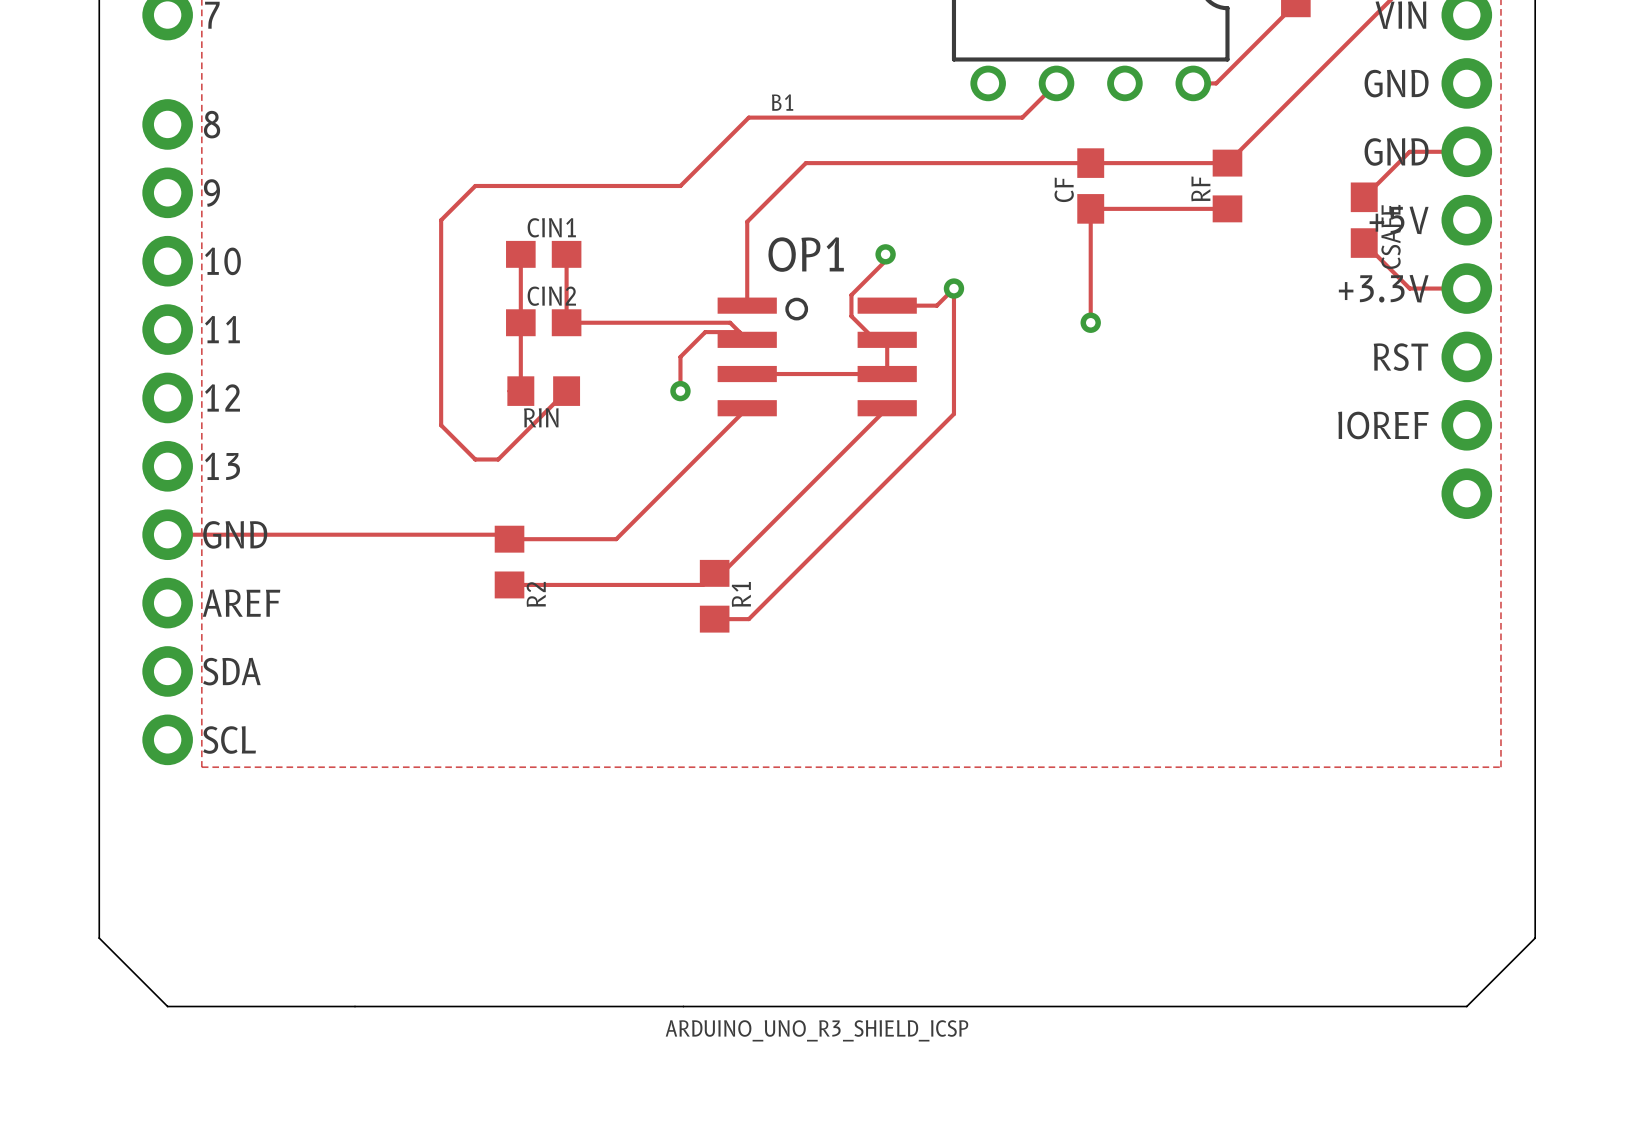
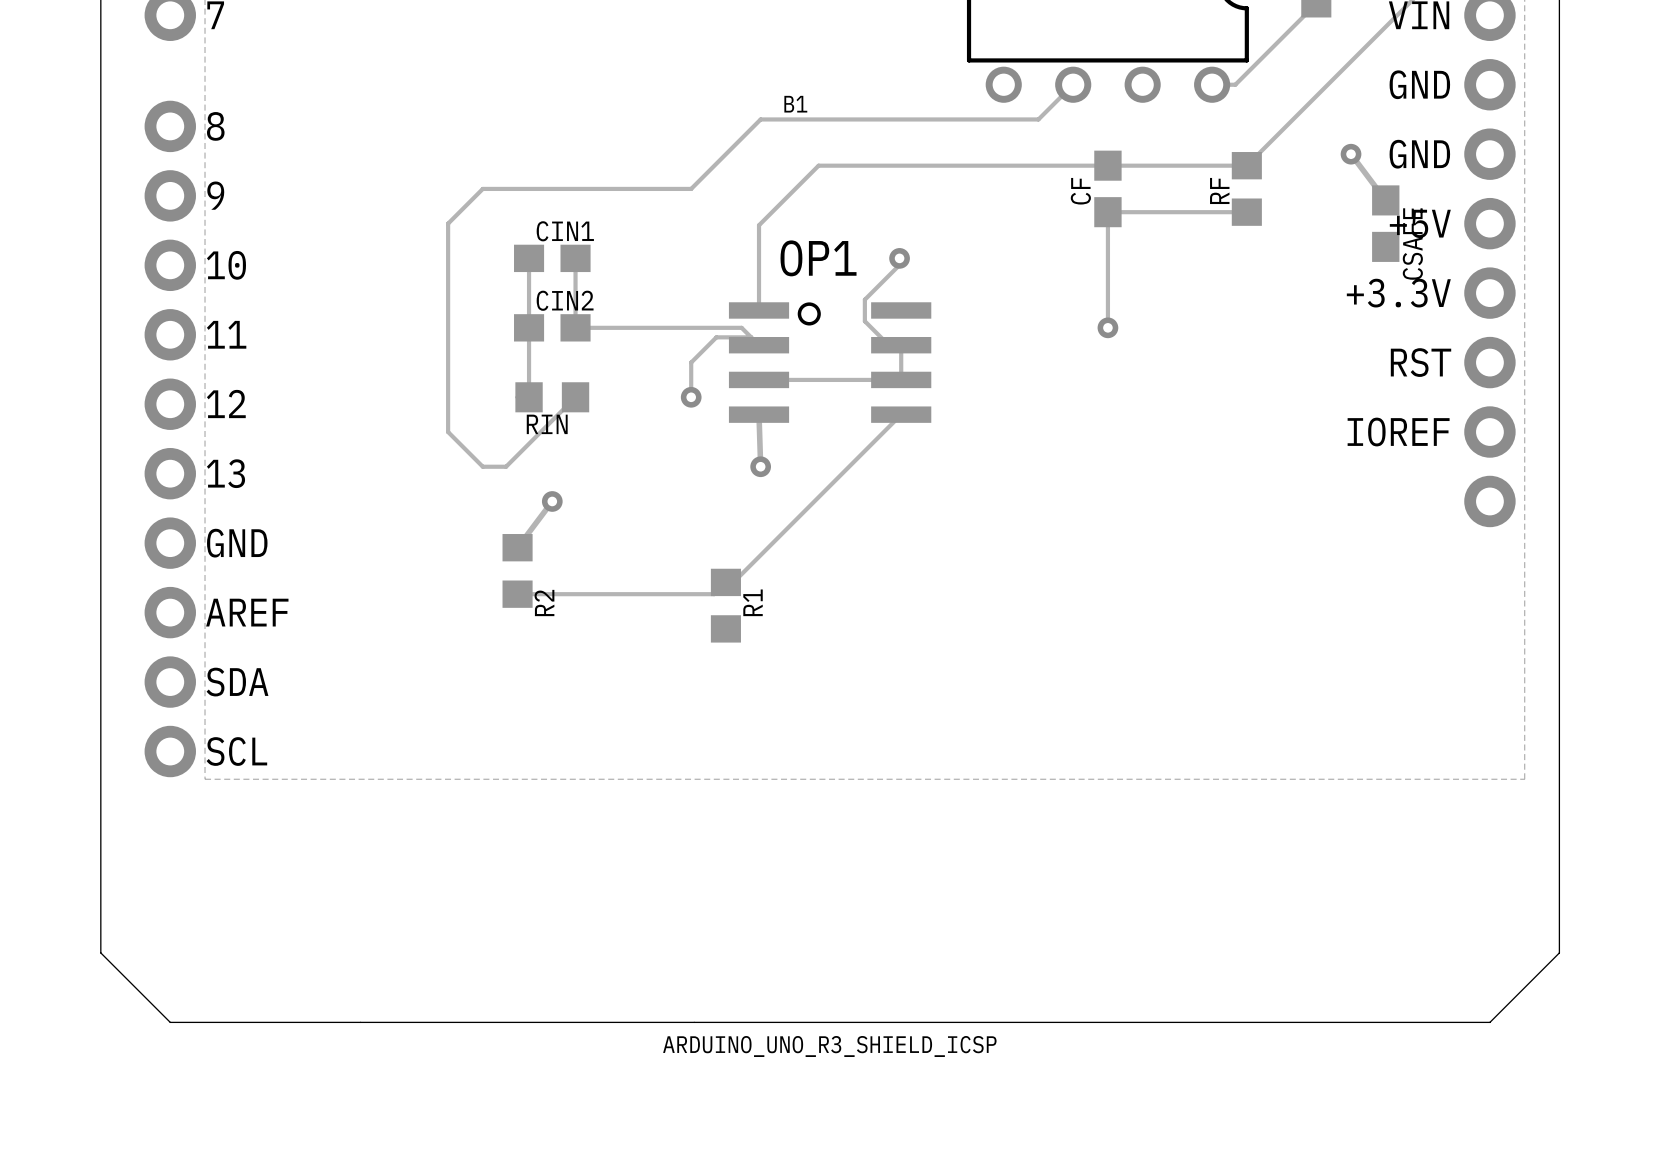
via: none -> (1351, 154)
track: (1466, 151) (1409, 151) (1364, 197) -> (1351, 154) (1385, 200)
track: (1364, 243) (1409, 288) (1466, 288) -> none
via: (953, 288) -> none
track: (887, 305) (936, 305) (953, 288) (953, 414) (748, 619) (714, 619) -> none
track: (747, 408) (616, 539) (509, 539) -> (552, 501) (517, 547)
track: none -> (759, 414) (760, 466)
via: none -> (760, 466)
via: none -> (552, 501)
track: (167, 534) (505, 534) -> none

